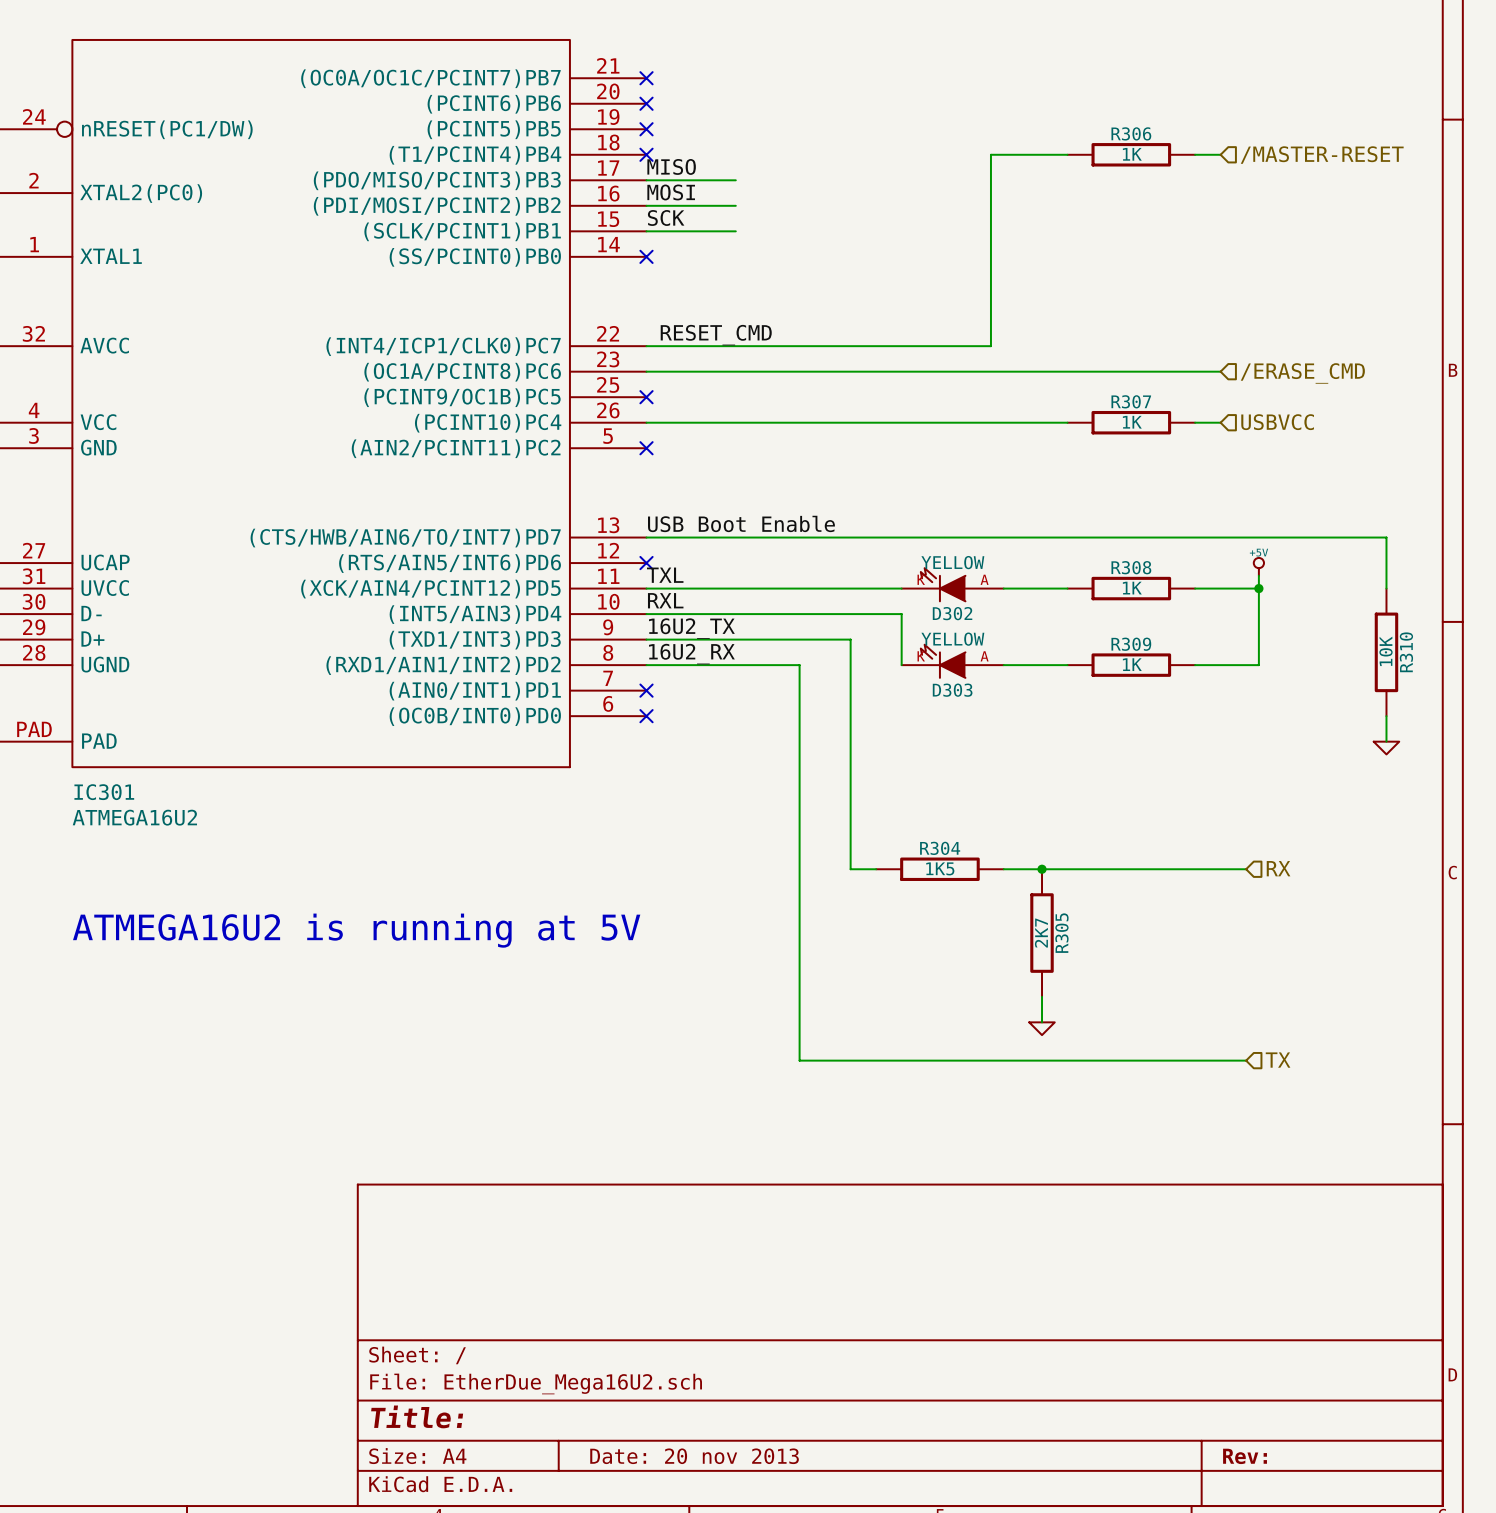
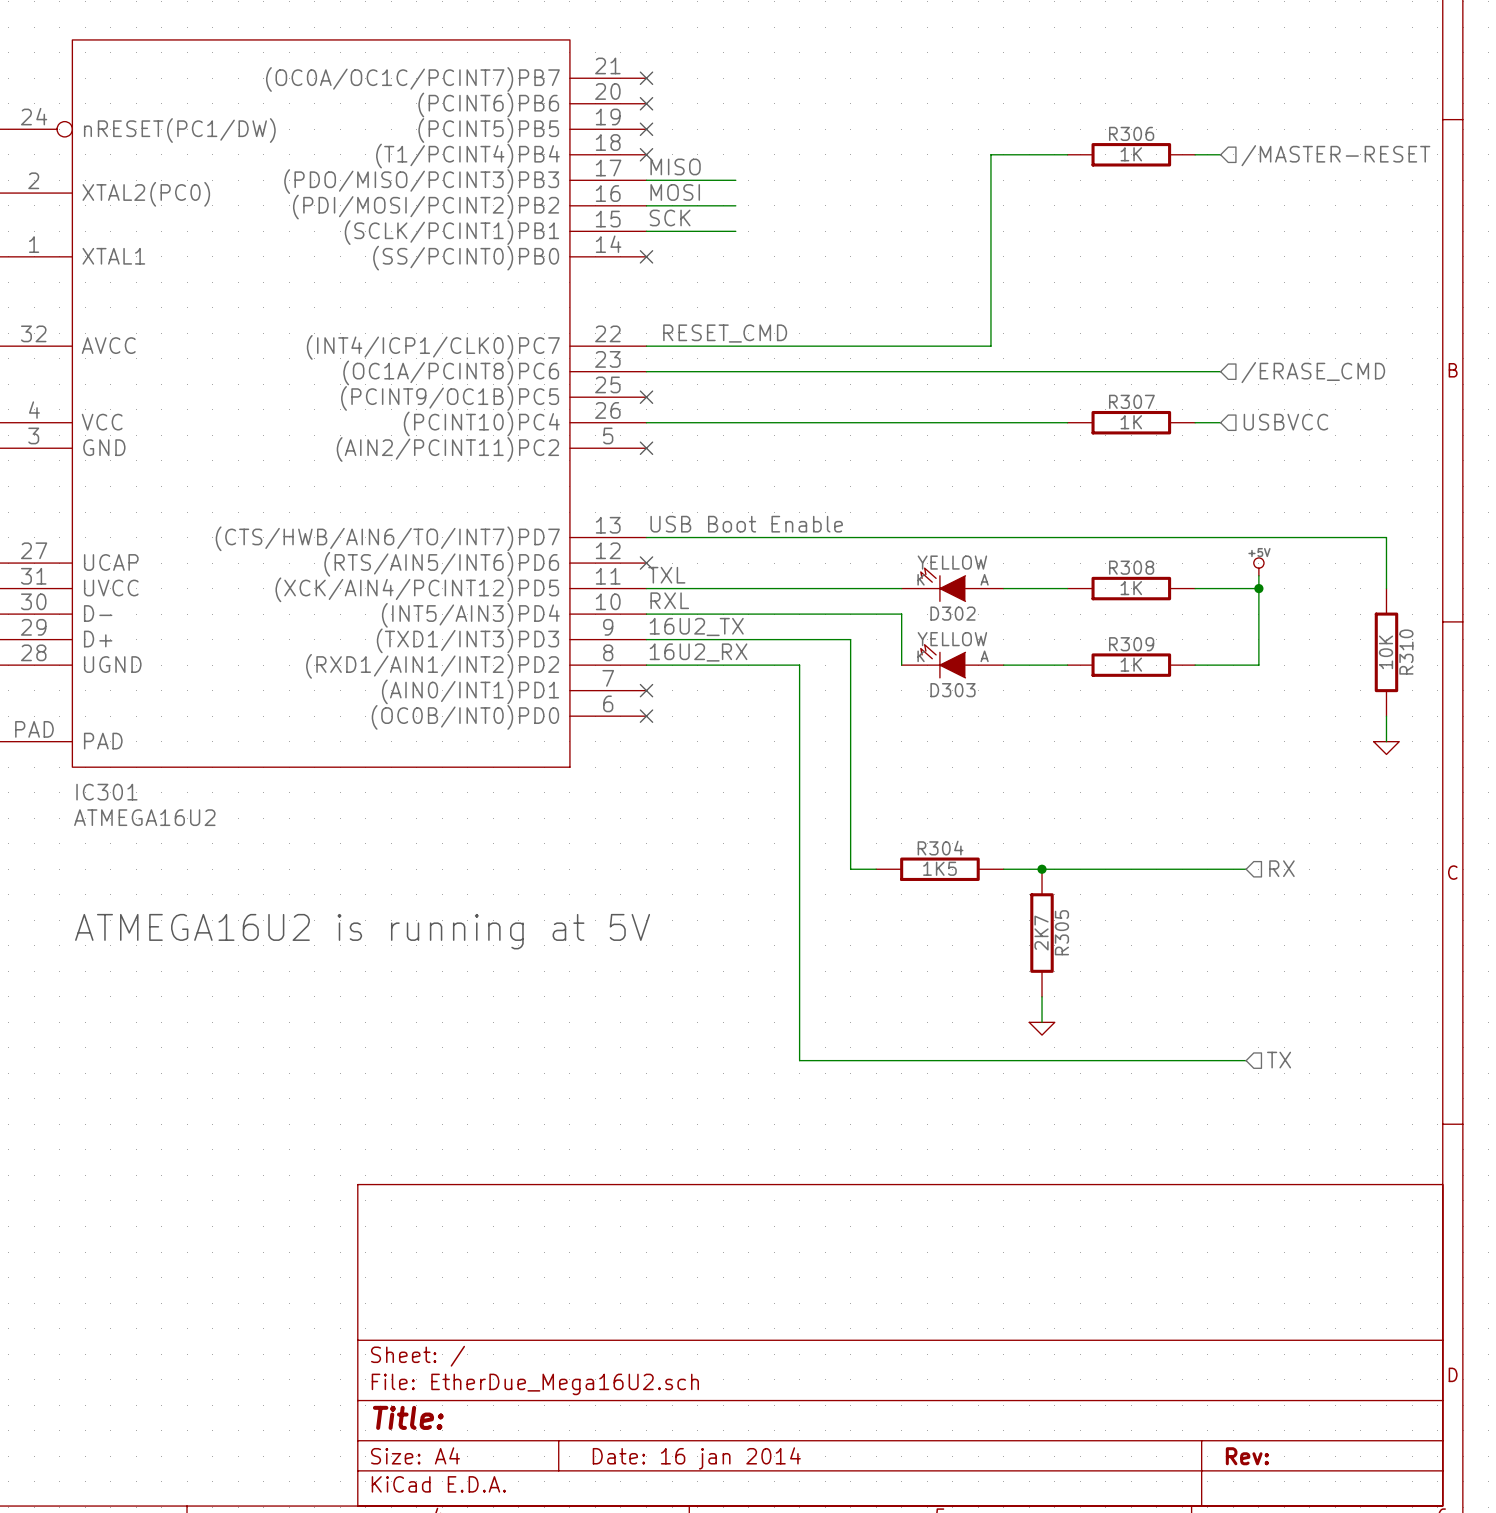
title block: Date: 20 nov 2013 (694, 1456) -> Date: 16 jan 2014 (696, 1458)

